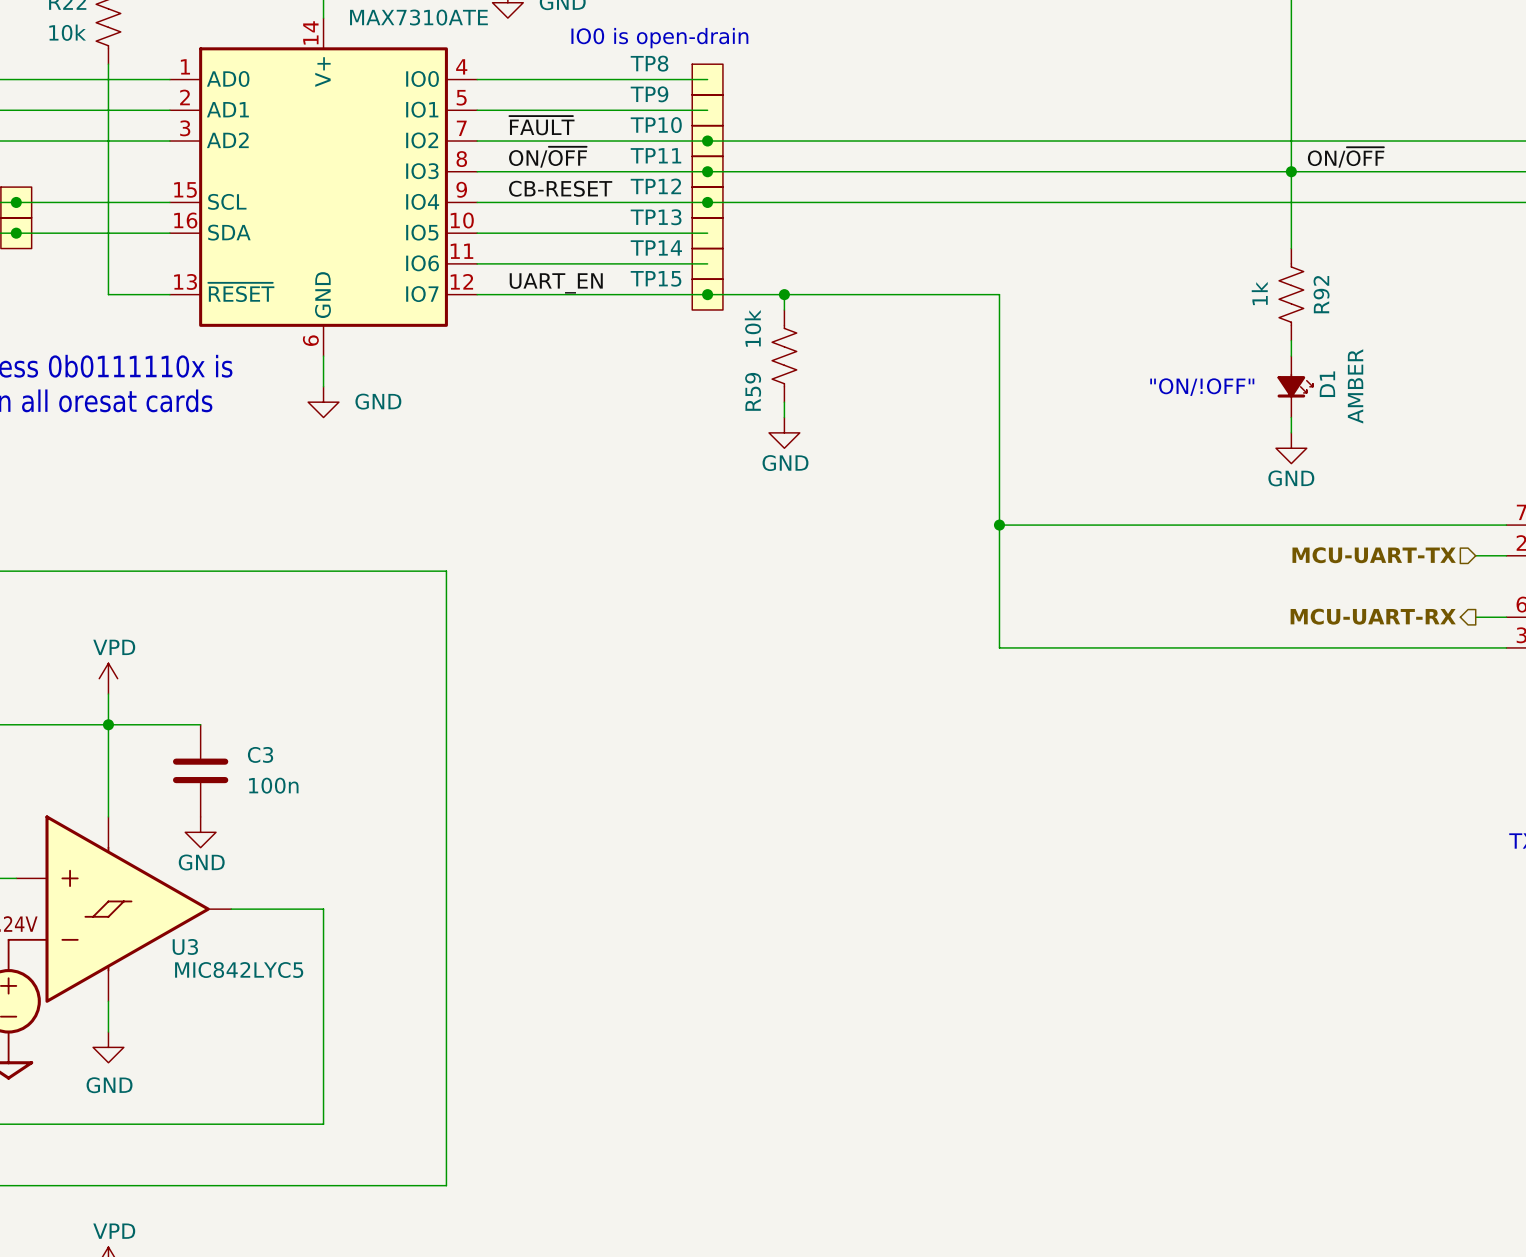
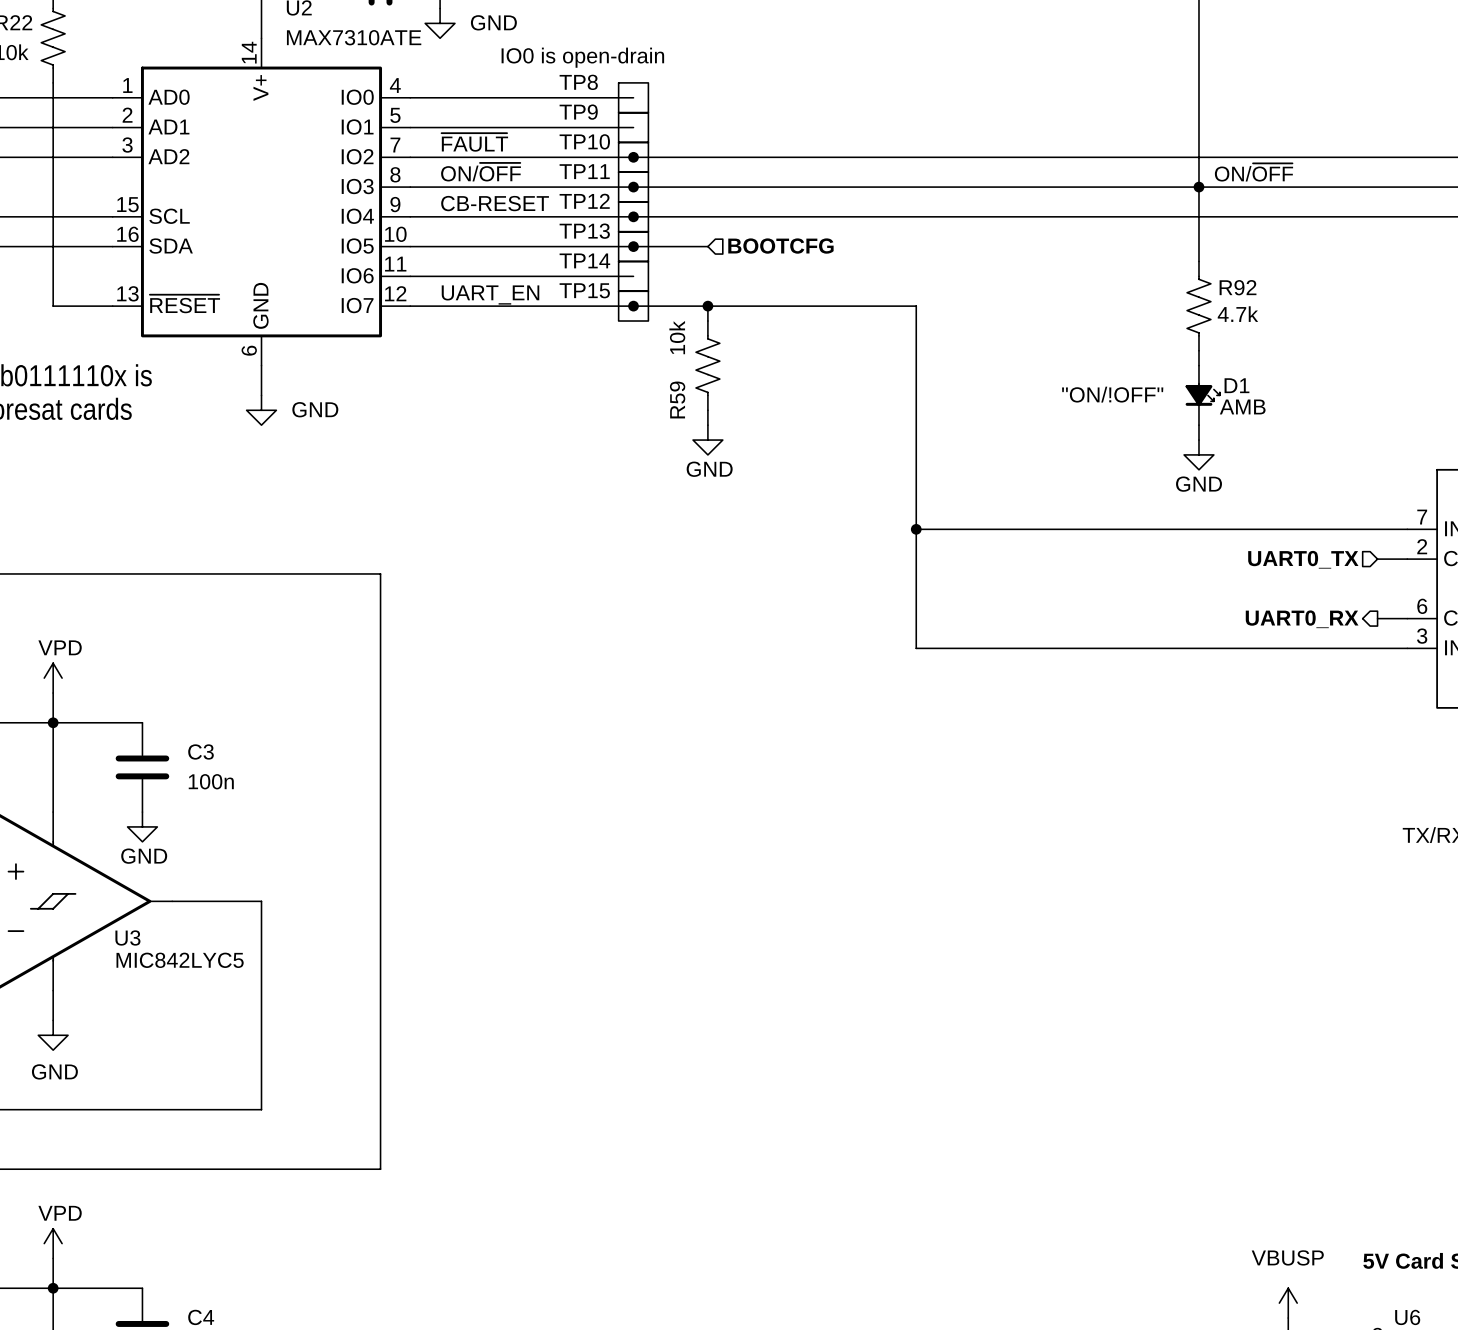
hierarchical label: none -> BOOTCFG (780, 246)
wire: none -> (633, 246) (707, 246)
junction: none -> (633, 246)
R92 value: 1k (1259, 293) -> 4.7k (1237, 314)
R92 name rotation: 0° (1321, 294) -> 90° clockwise (1238, 287)
D1 name rotation: 0° (1327, 384) -> 90° clockwise (1236, 385)
D1 value: AMBER (1355, 386) -> AMB (1242, 406)
hierarchical label: MCU-UART-TX (1374, 555) -> UART0_TX (1303, 559)
hierarchical label: MCU-UART-RX (1373, 616) -> UART0_RX (1302, 619)

